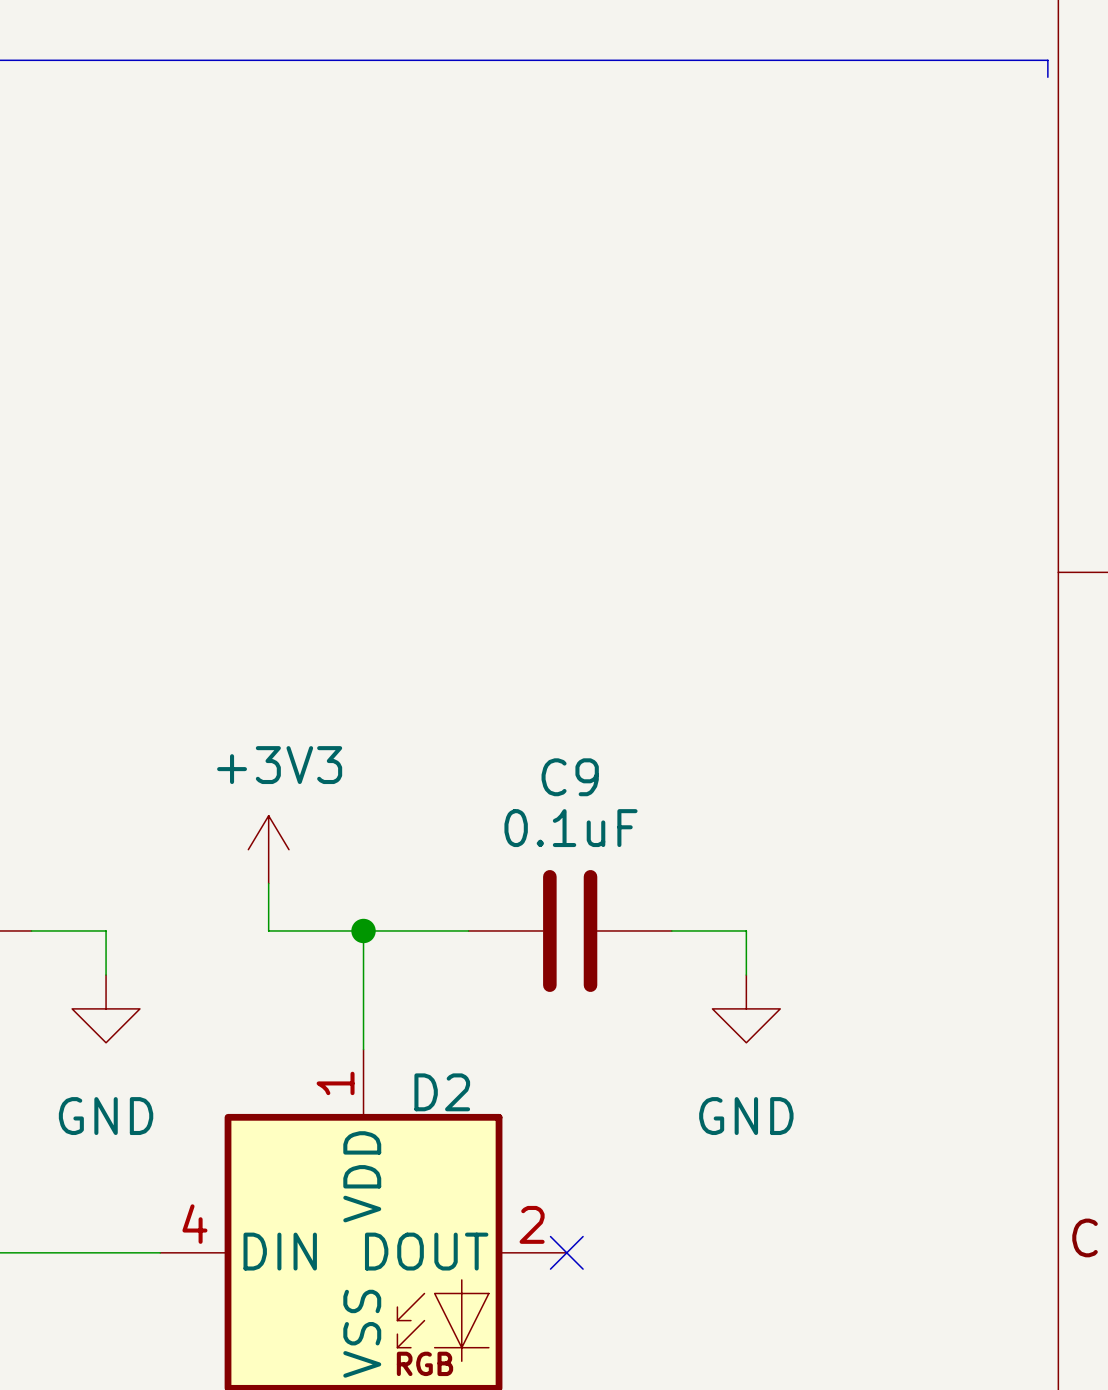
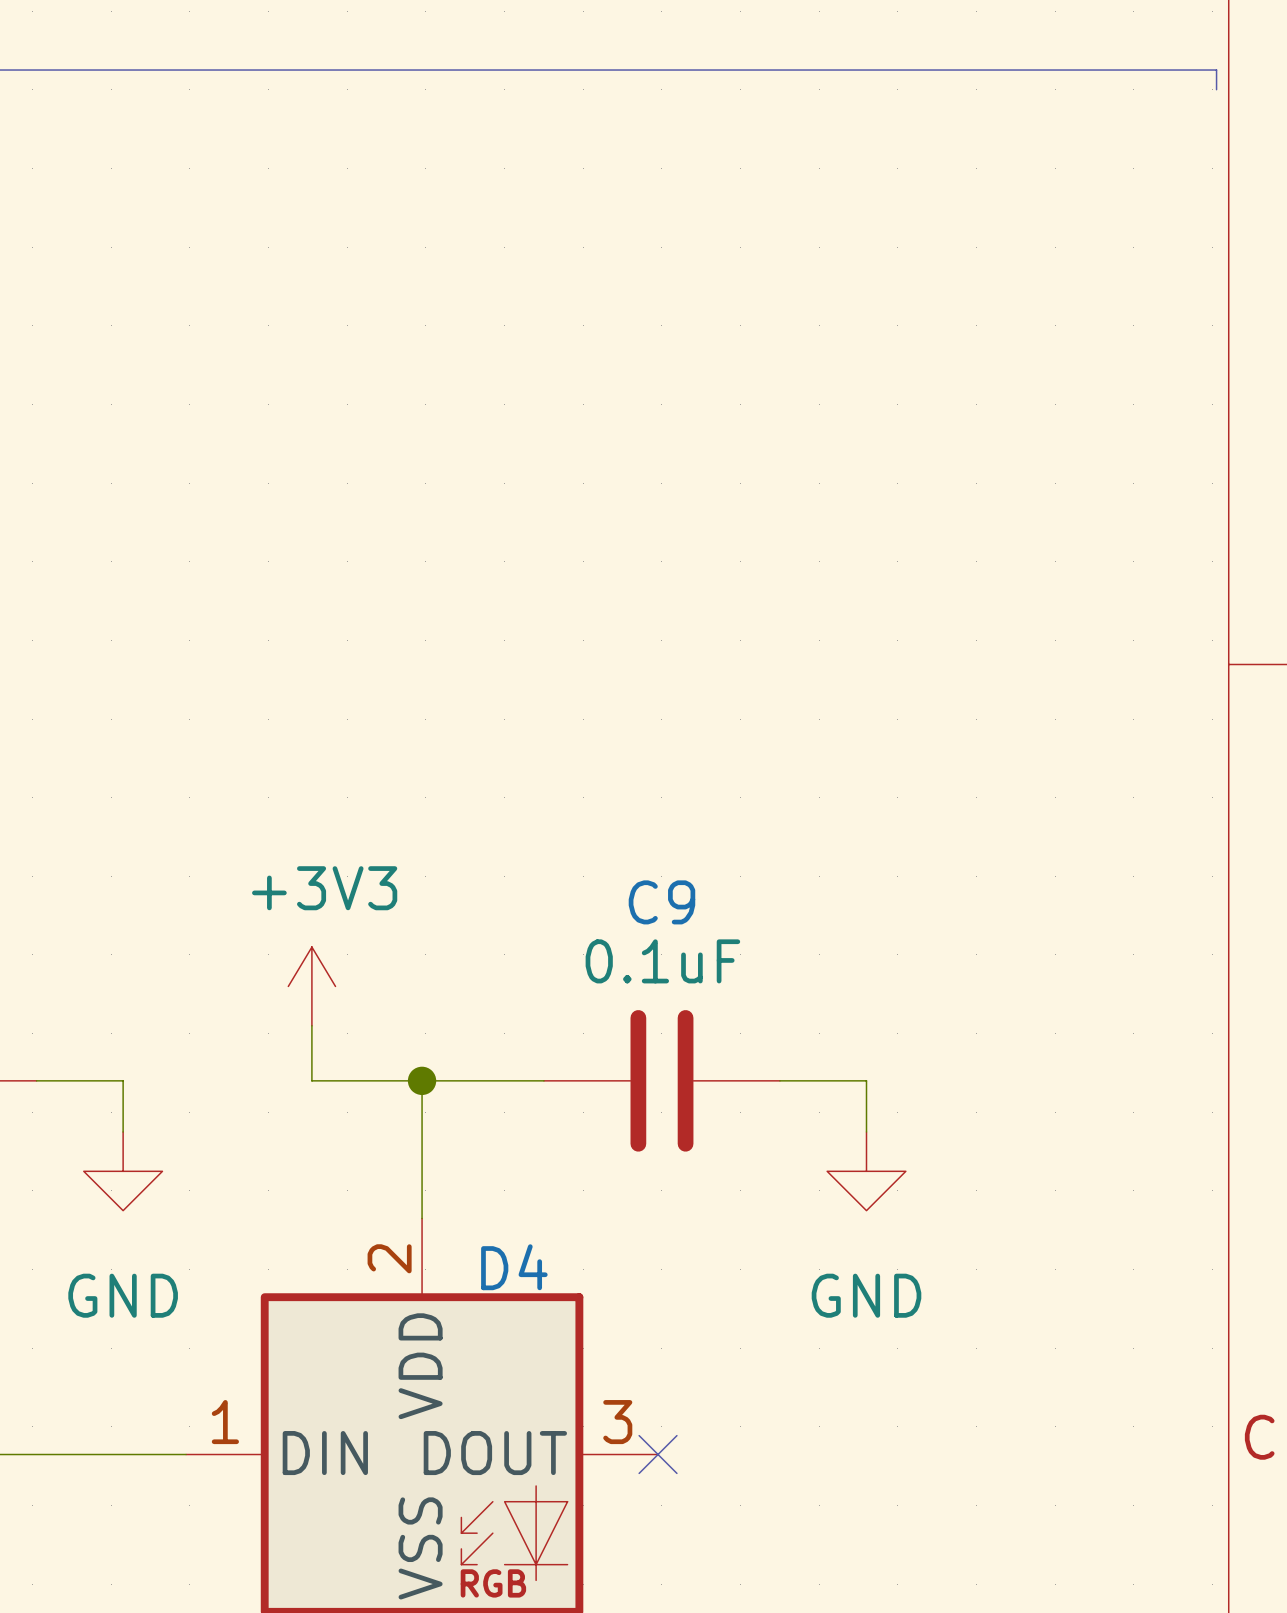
D2 pin number: 1 (335, 1083) -> 2 (389, 1258)
D2 name: D2 (442, 1092) -> D4 (514, 1267)
D2 pin number: 4 (194, 1224) -> 1 (225, 1422)
D2 pin number: 2 (532, 1224) -> 3 (617, 1422)

